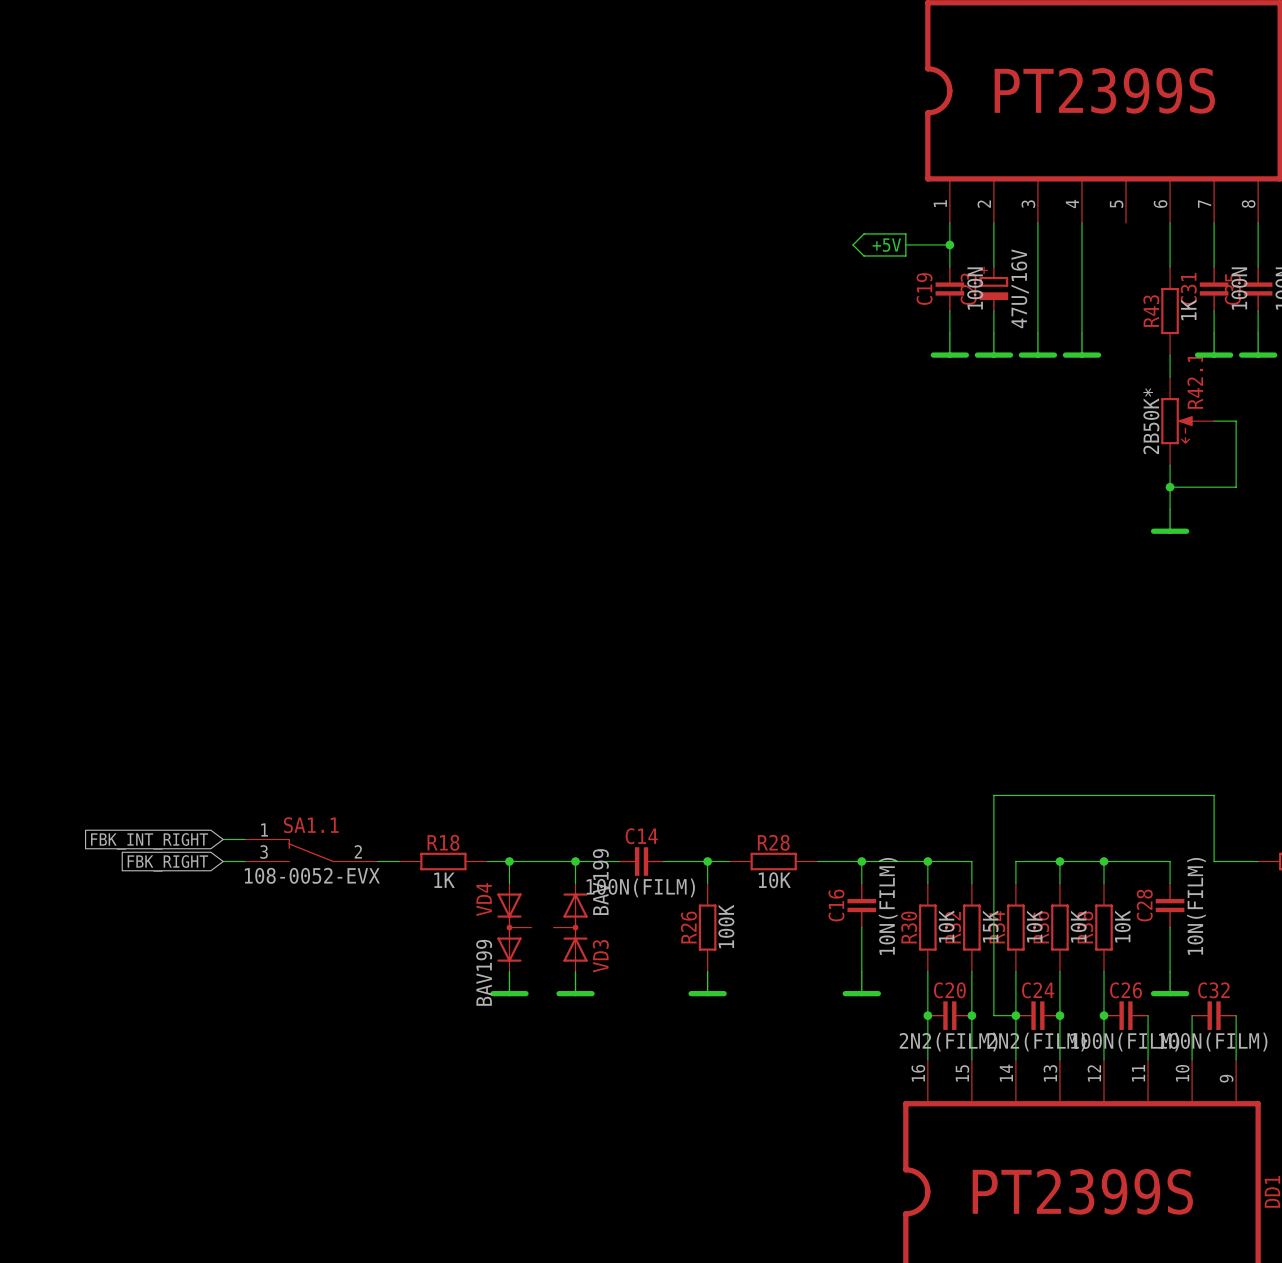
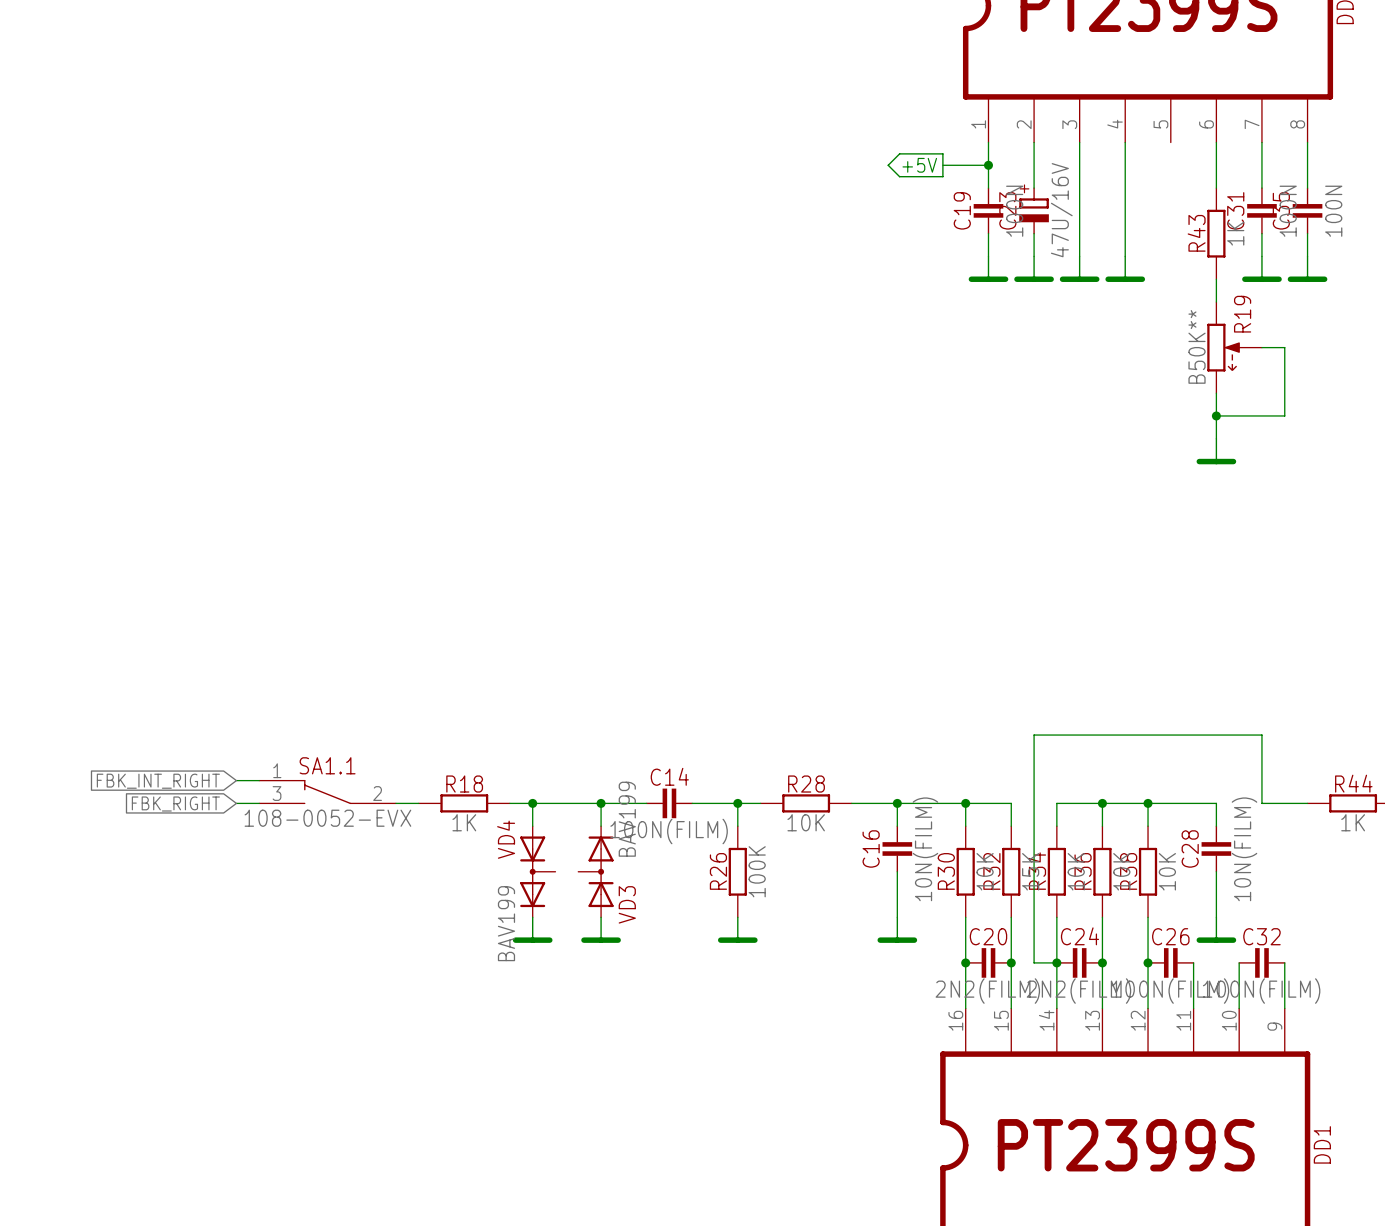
R42.1 name: R42.1 (1195, 381) -> R19 (1242, 314)
R42.1 value: 2B50K* (1151, 421) -> B50K** (1197, 346)

